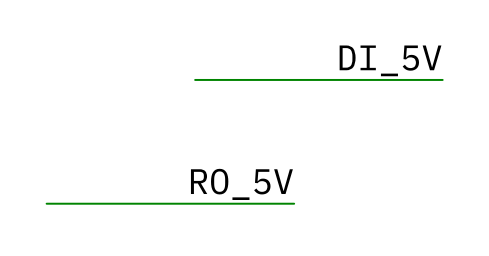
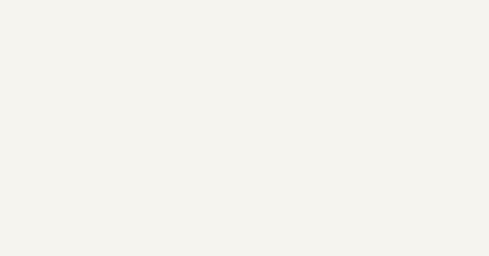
label: DI_5V (390, 60) -> none
wire: (195, 79) (442, 79) -> none
label: RO_5V (241, 184) -> none
wire: (46, 203) (294, 203) -> none

